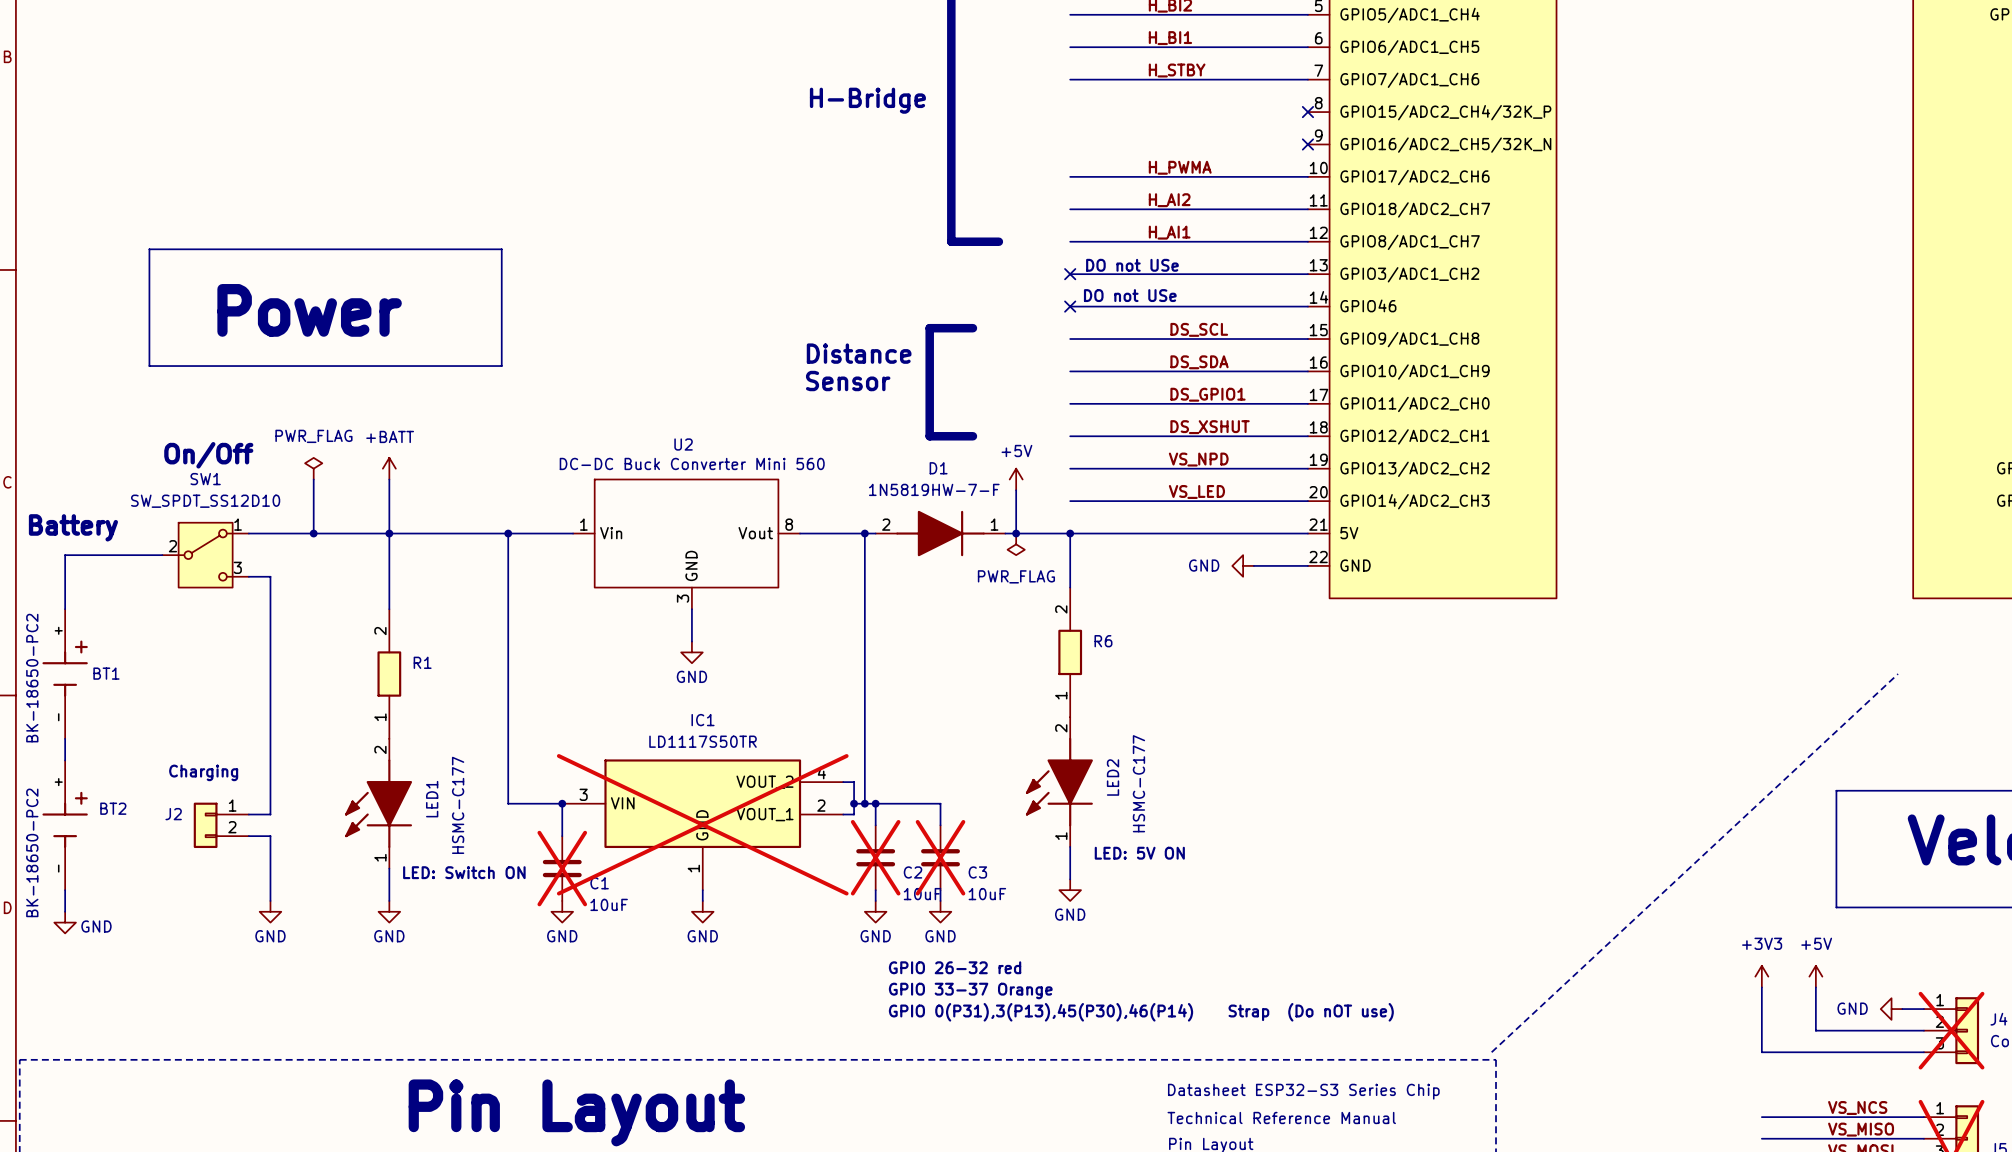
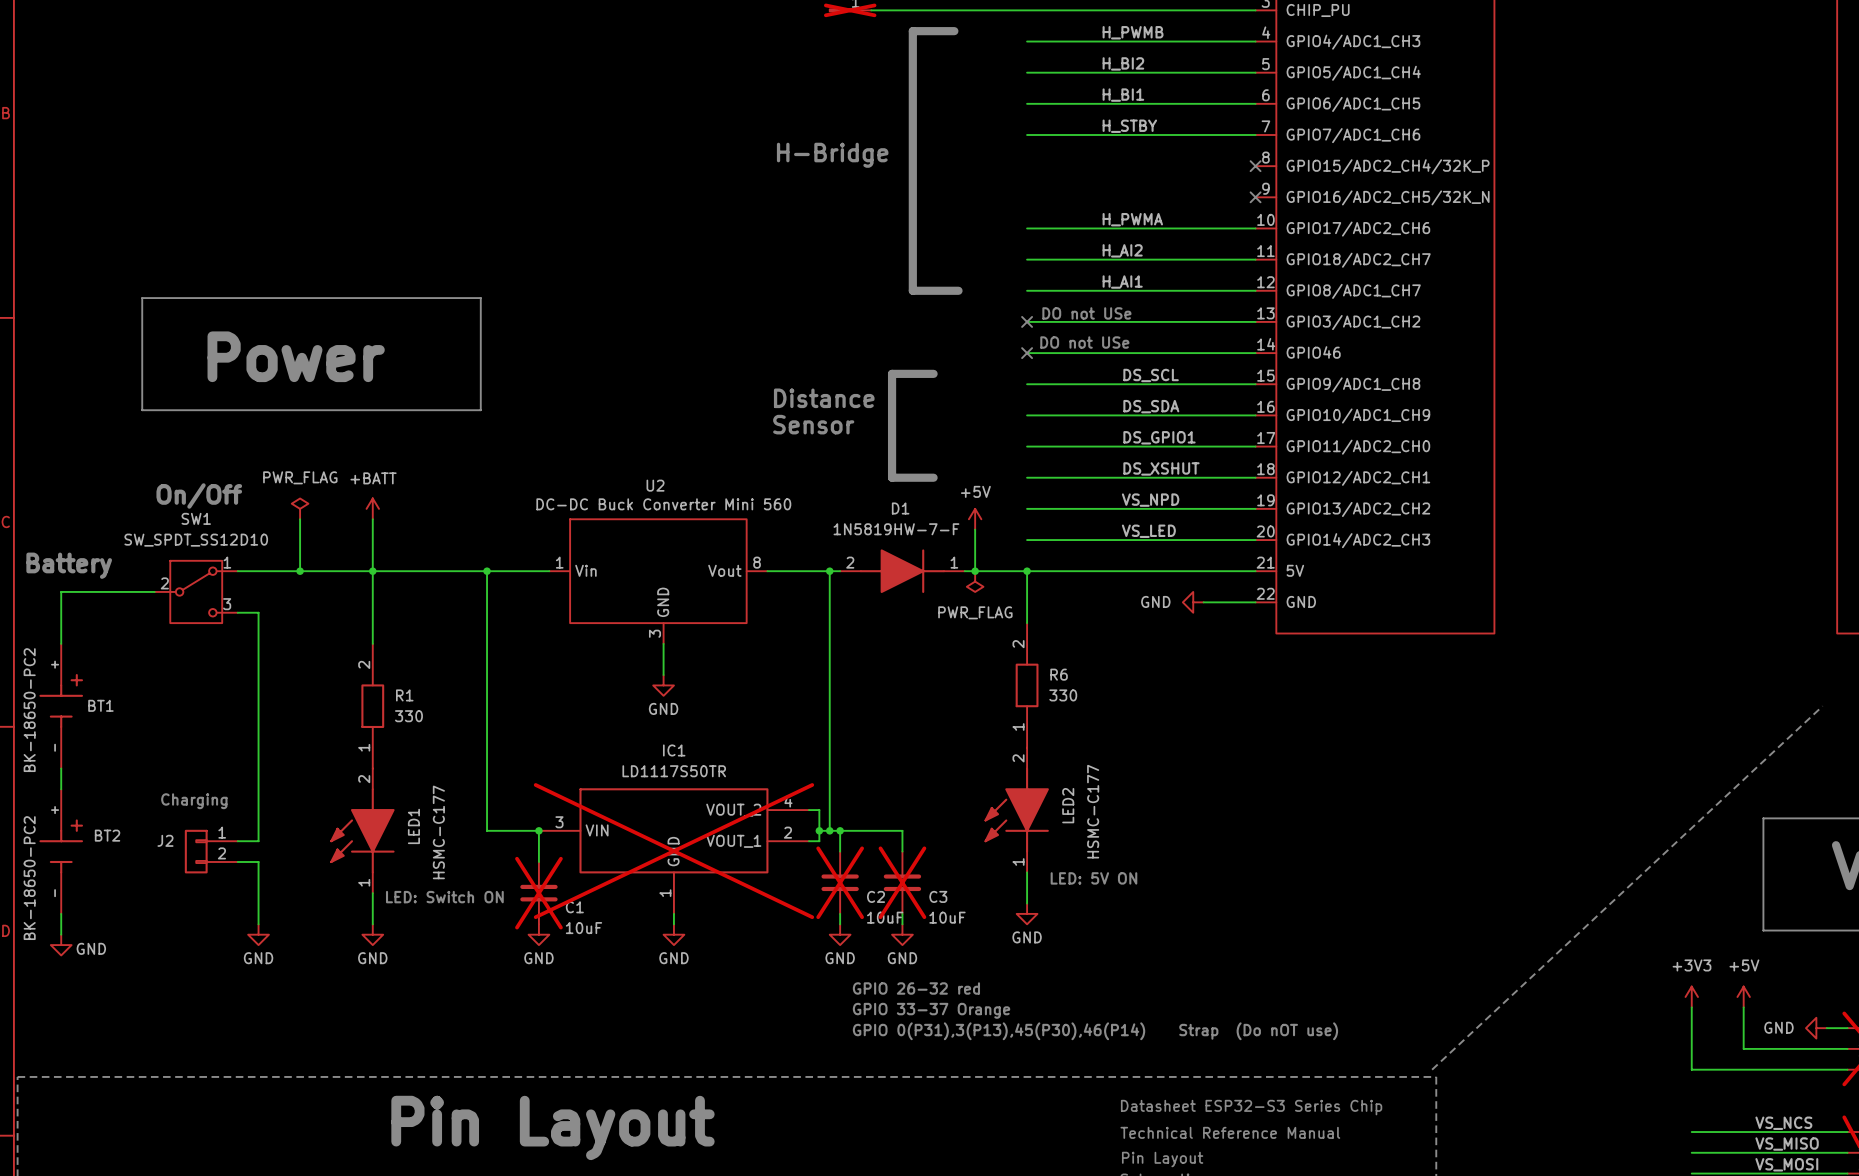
R6 value: none -> 330 (1063, 695)
R1 value: none -> 330 (408, 716)

